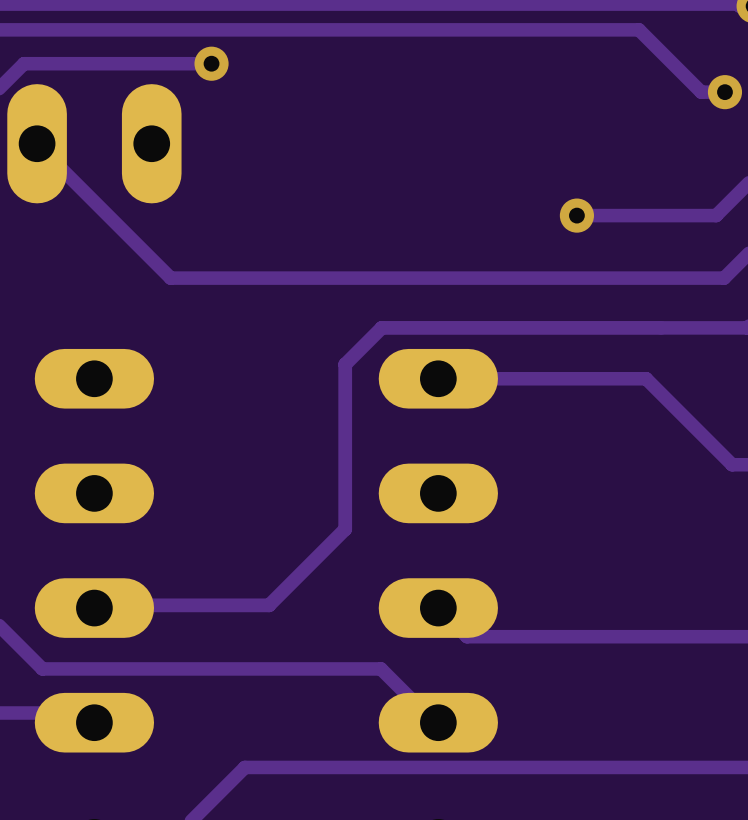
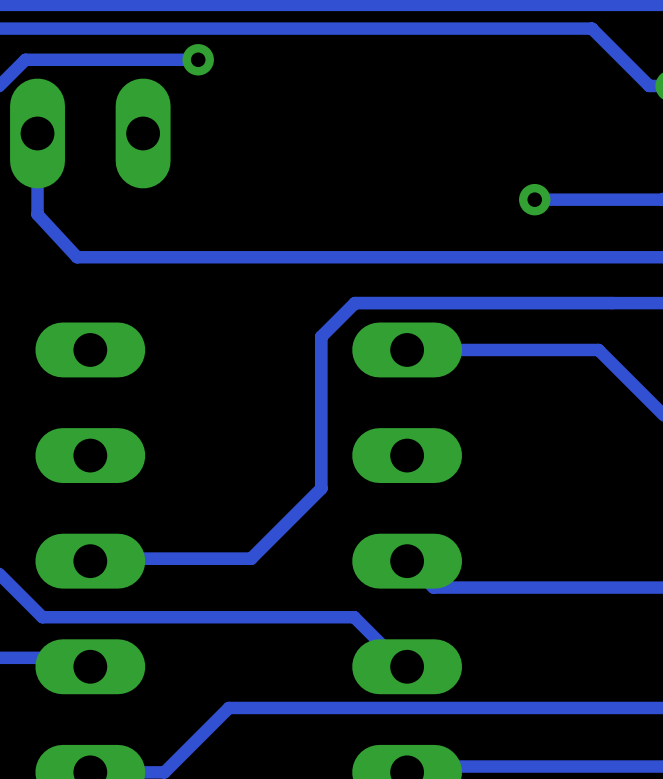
track: (37, 143) (170, 278) -> (37, 133) (37, 214) (77, 257) (160, 257)

